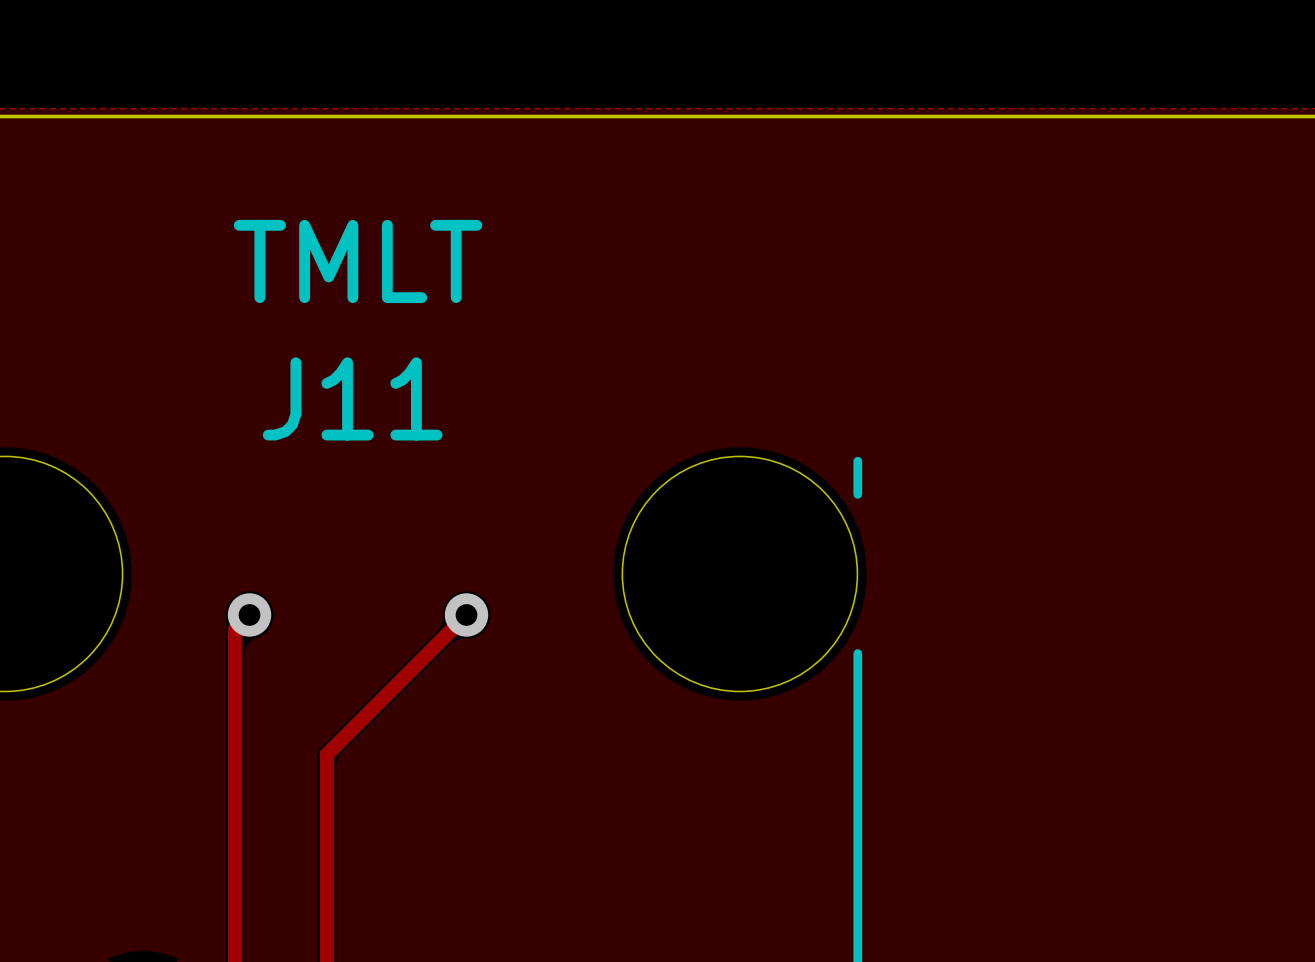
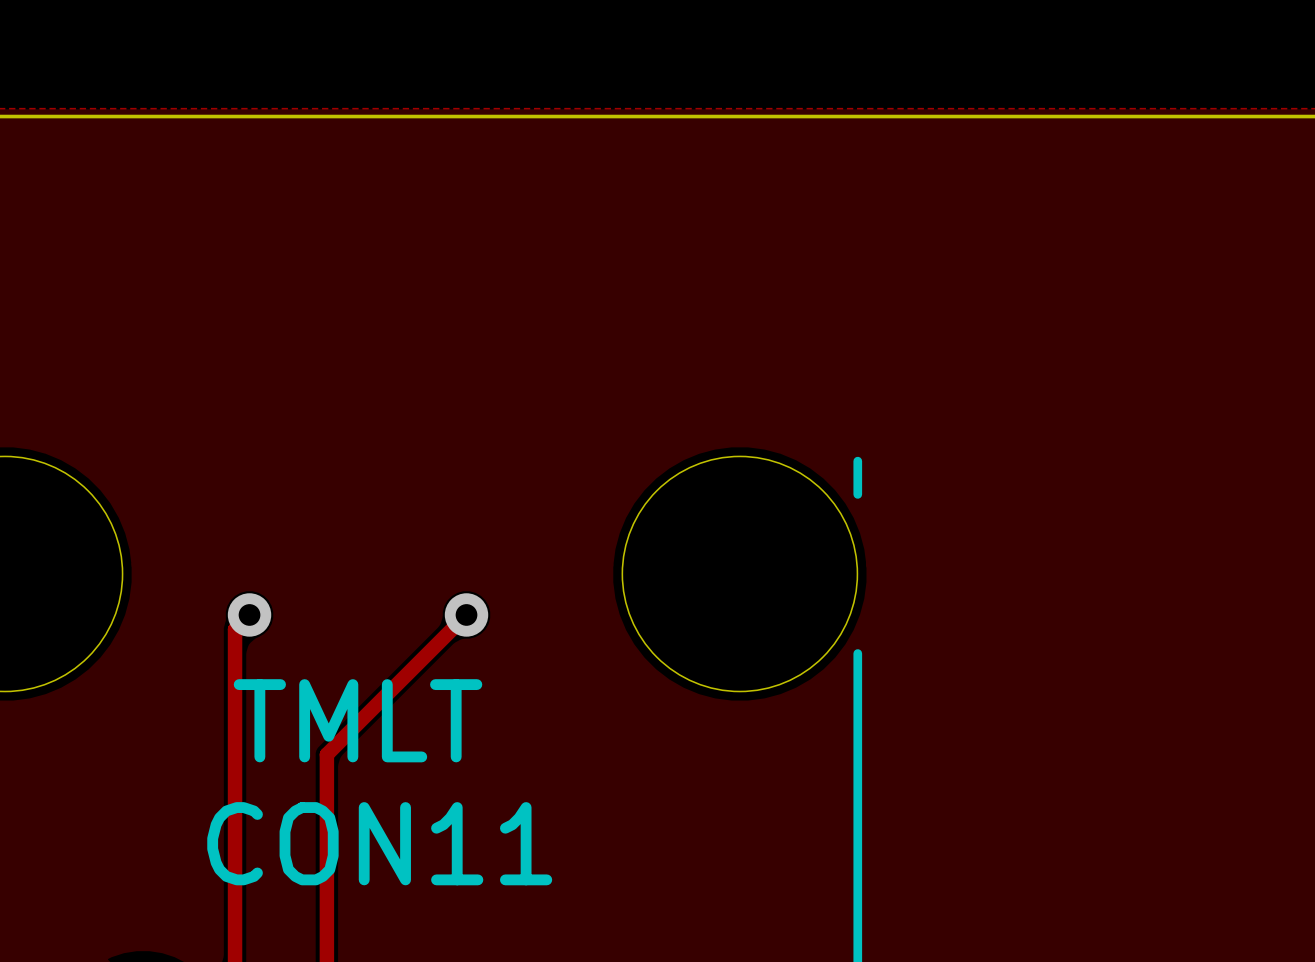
J11 value position: TMLT (358, 261) -> TMLT (358, 720)
J11 name: J11 (352, 398) -> CON11 (379, 843)

